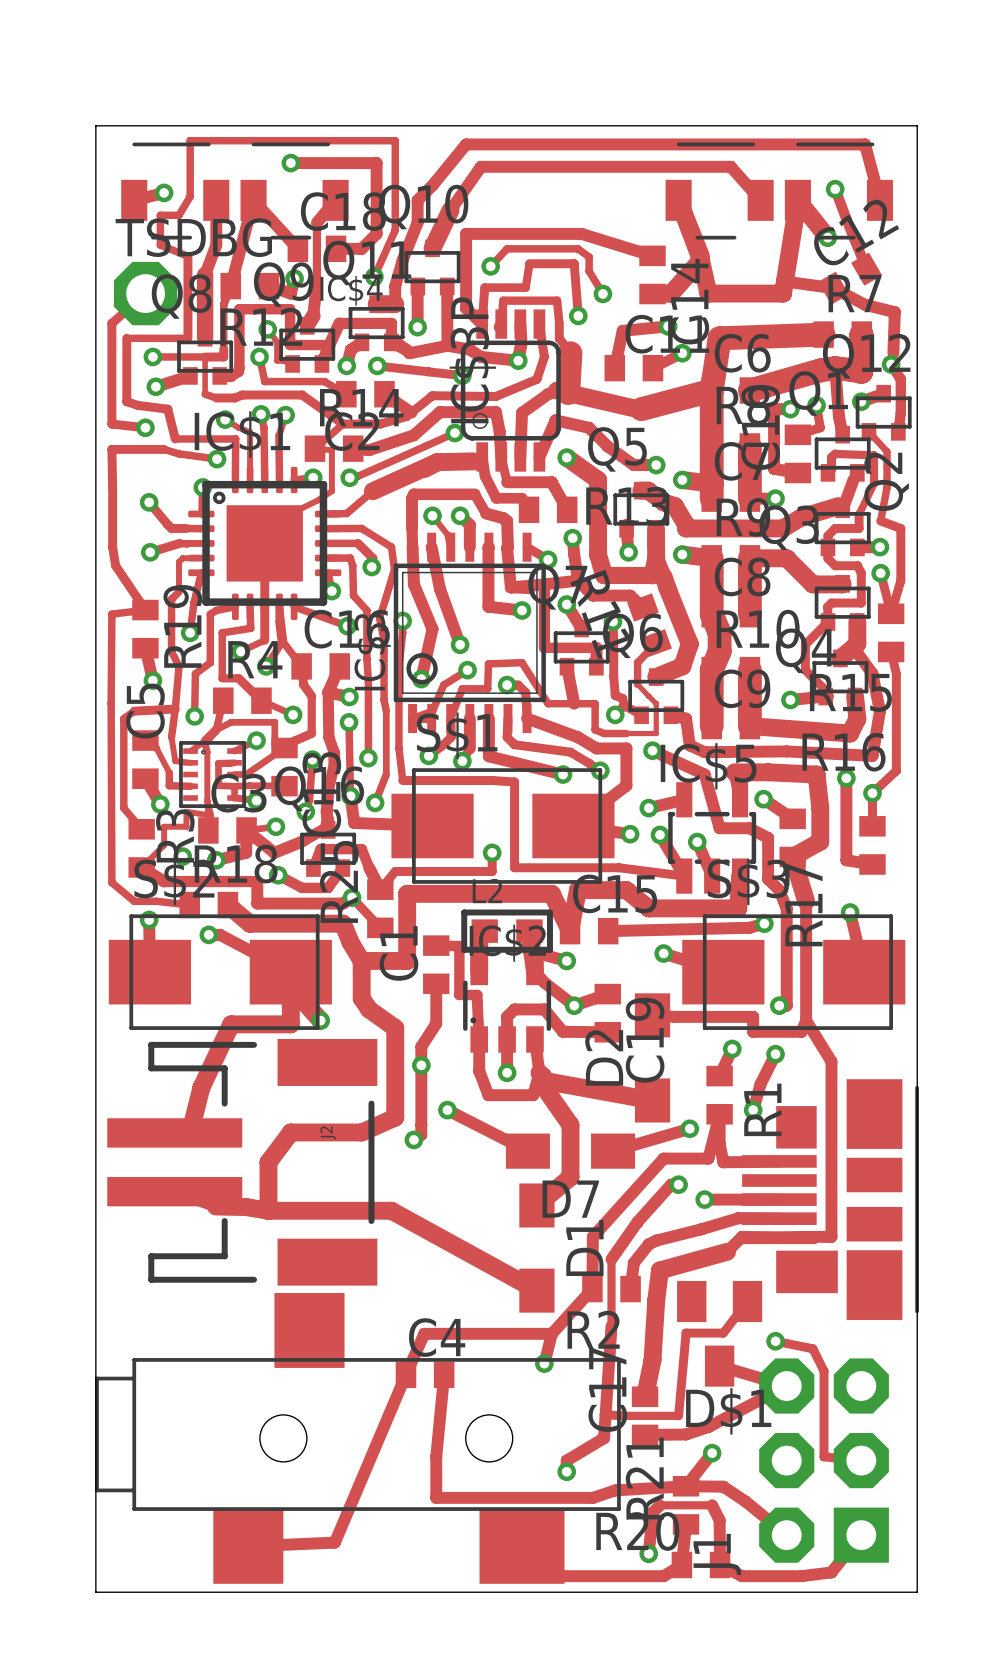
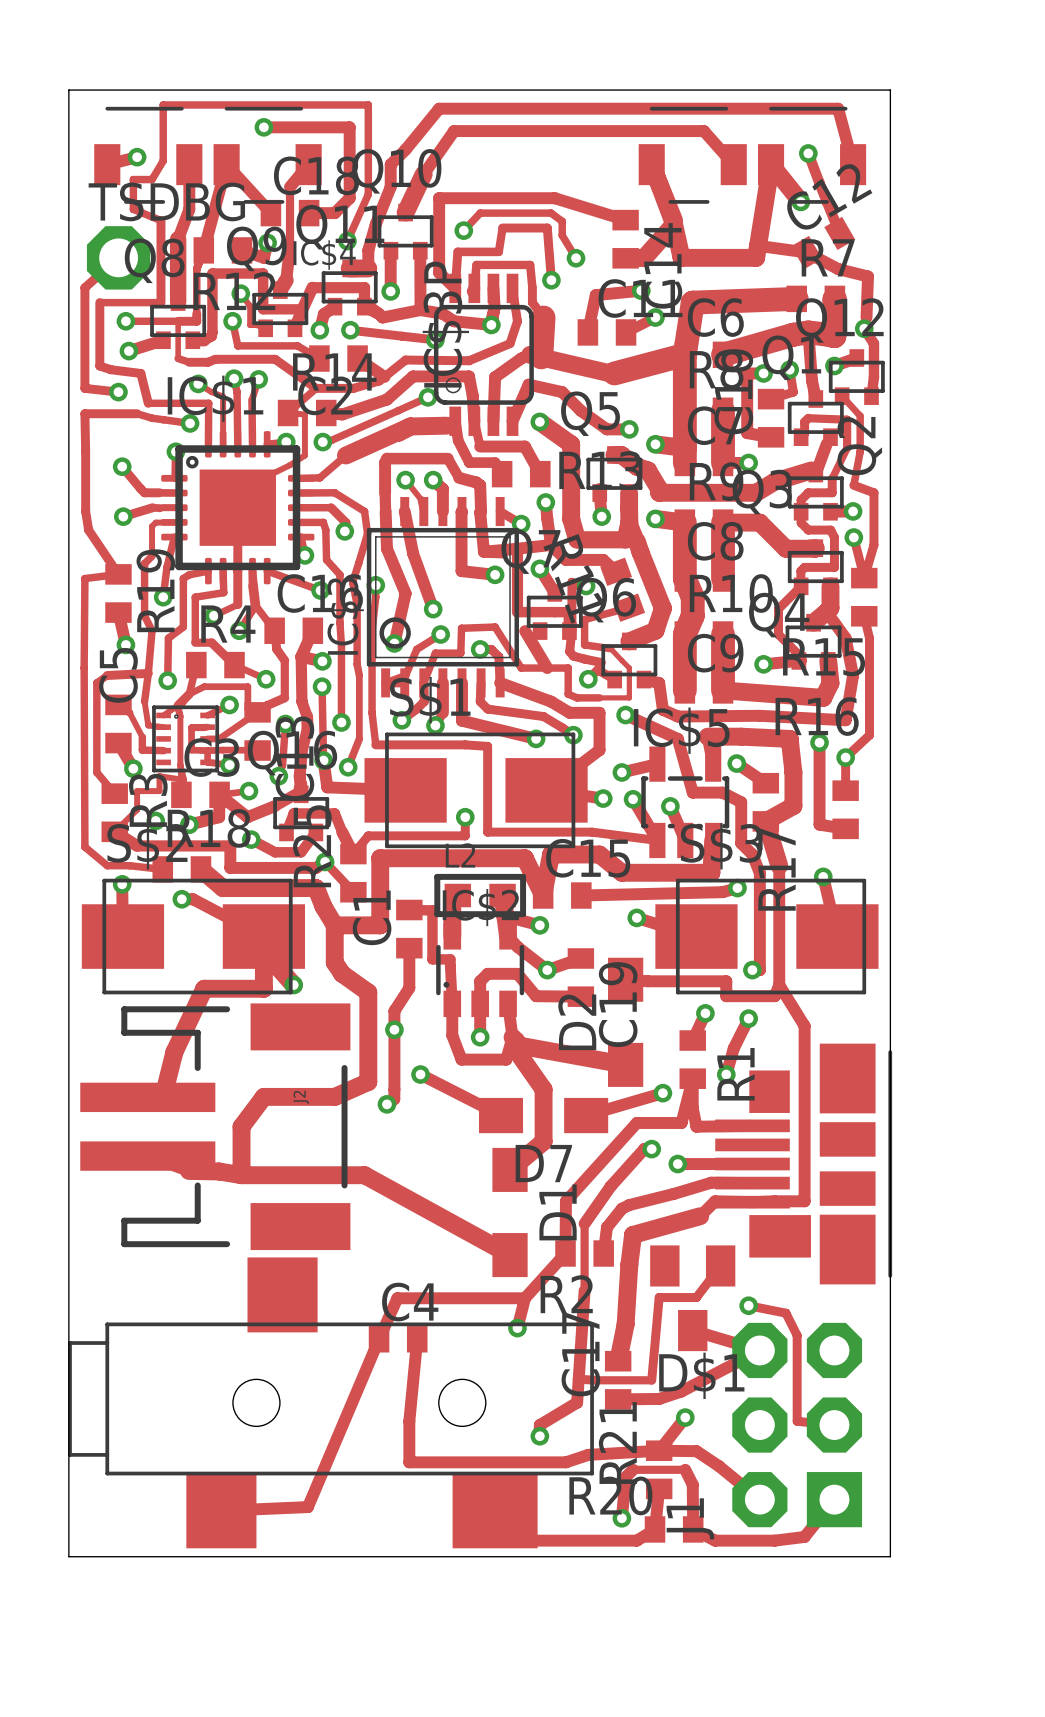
track: none -> (574, 586) (571, 582) (571, 630) (569, 651) (573, 656) (601, 662)
track: (612, 621) (615, 695) (622, 698) (624, 705) -> none
track: (656, 643) (637, 662) (637, 684) -> (629, 607) (584, 619) (584, 644) (610, 648)
track: (566, 666) (574, 703) -> (525, 631) (547, 668)

